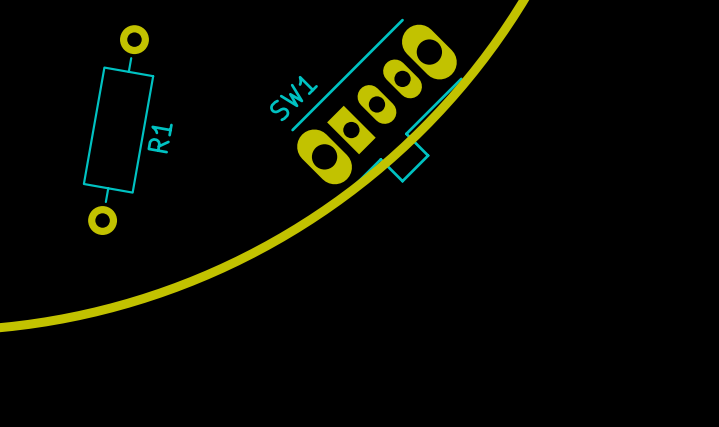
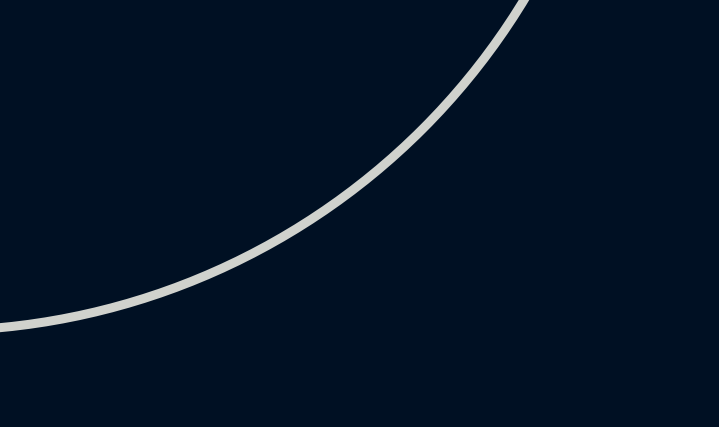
SW1: (376, 104) -> none
R1: (118, 130) -> none

